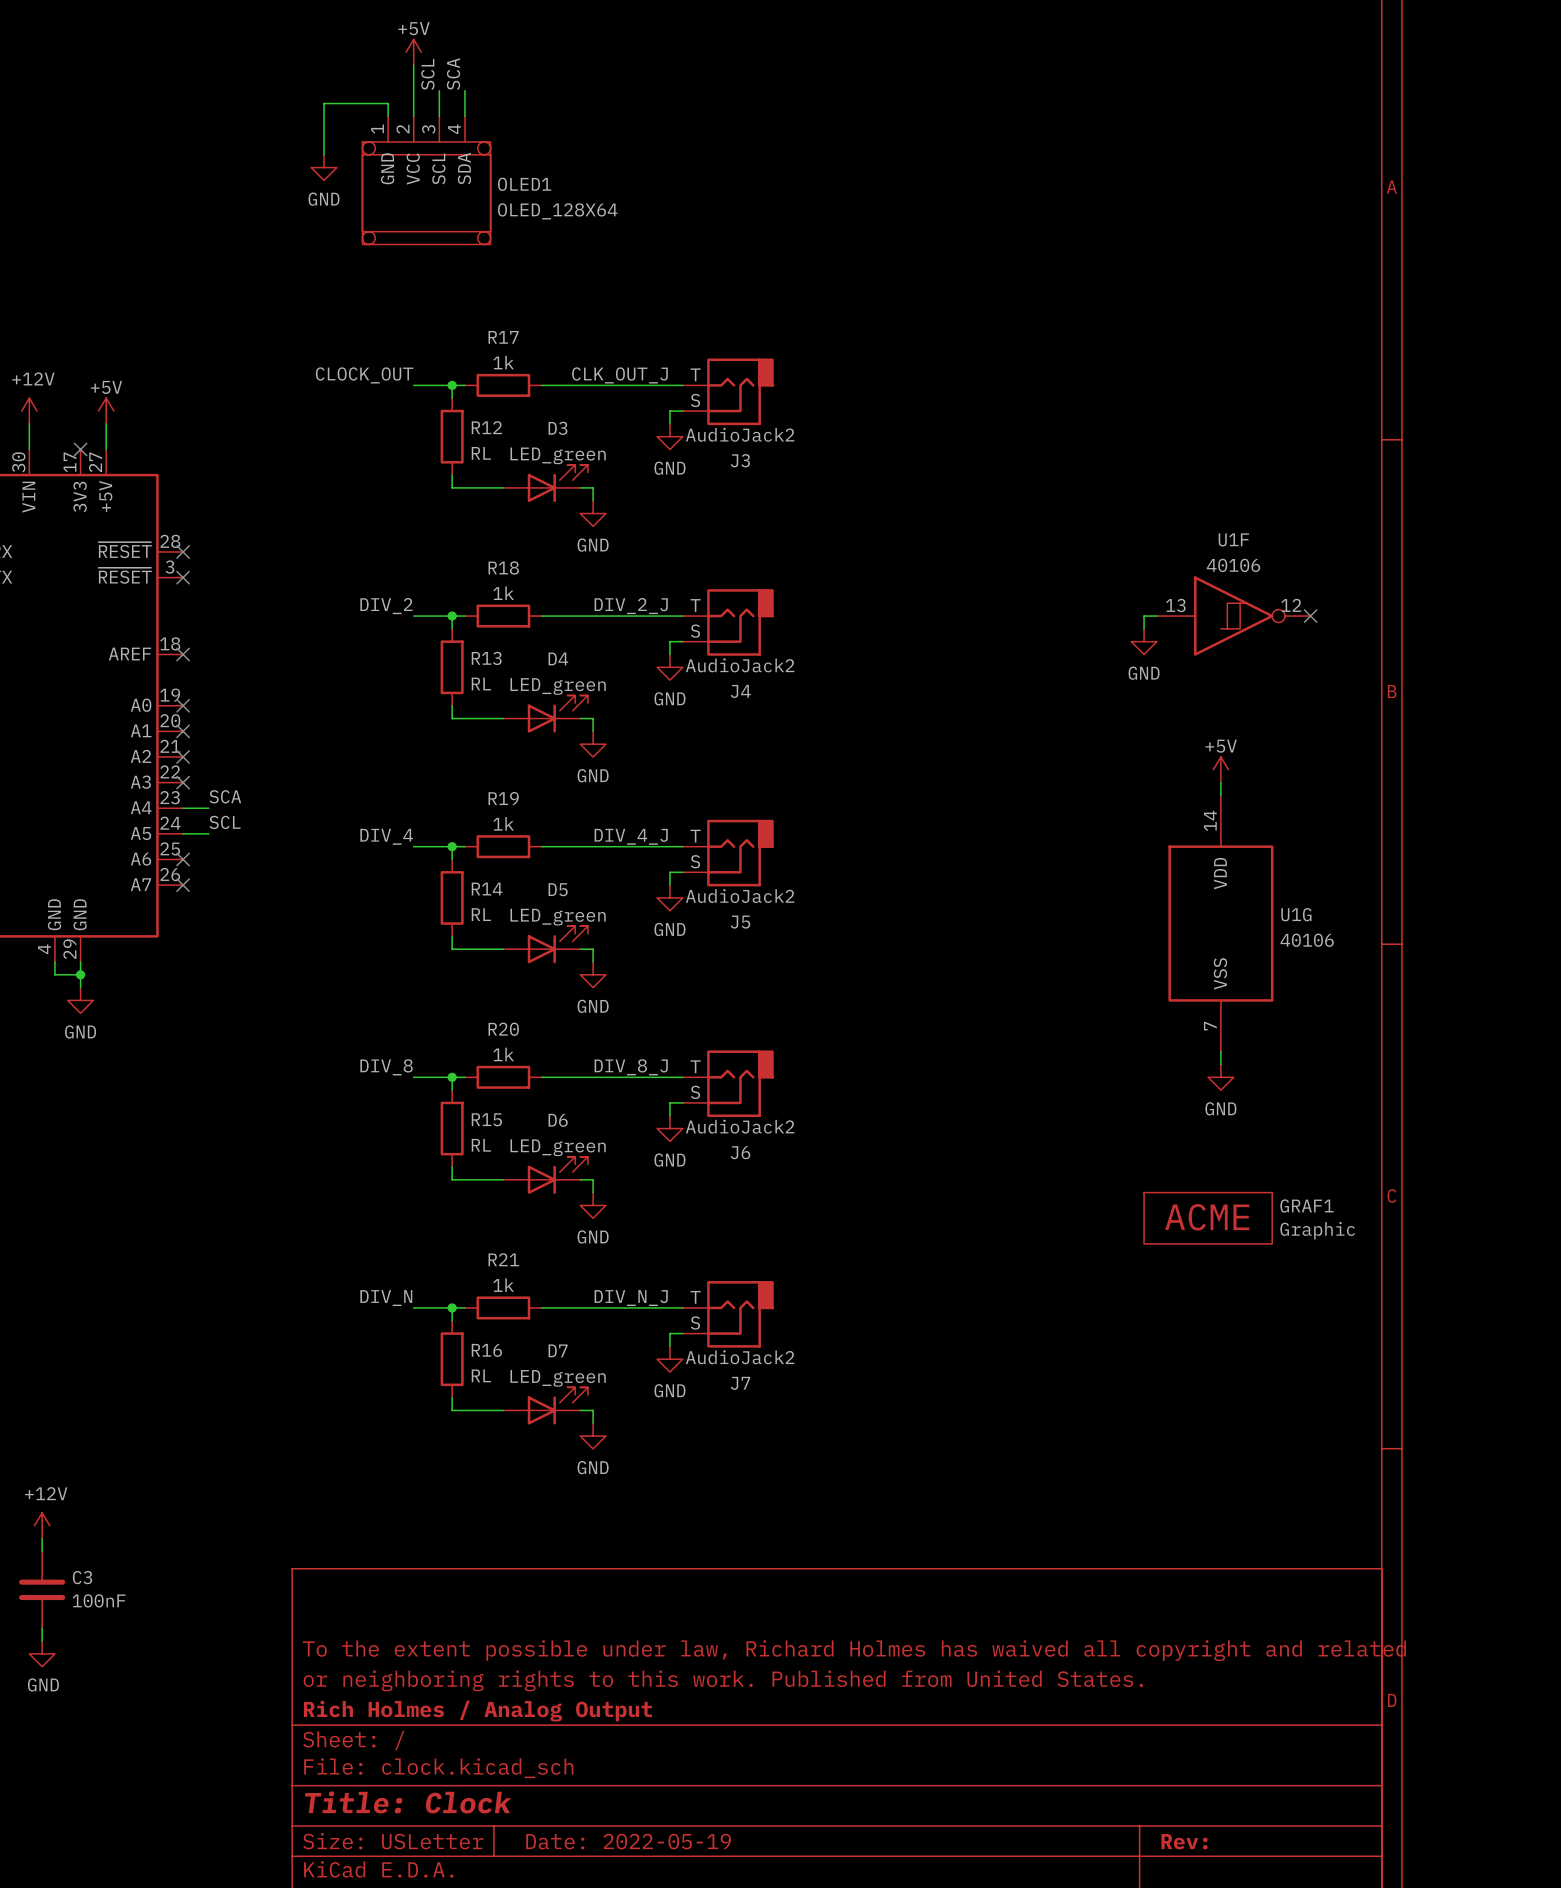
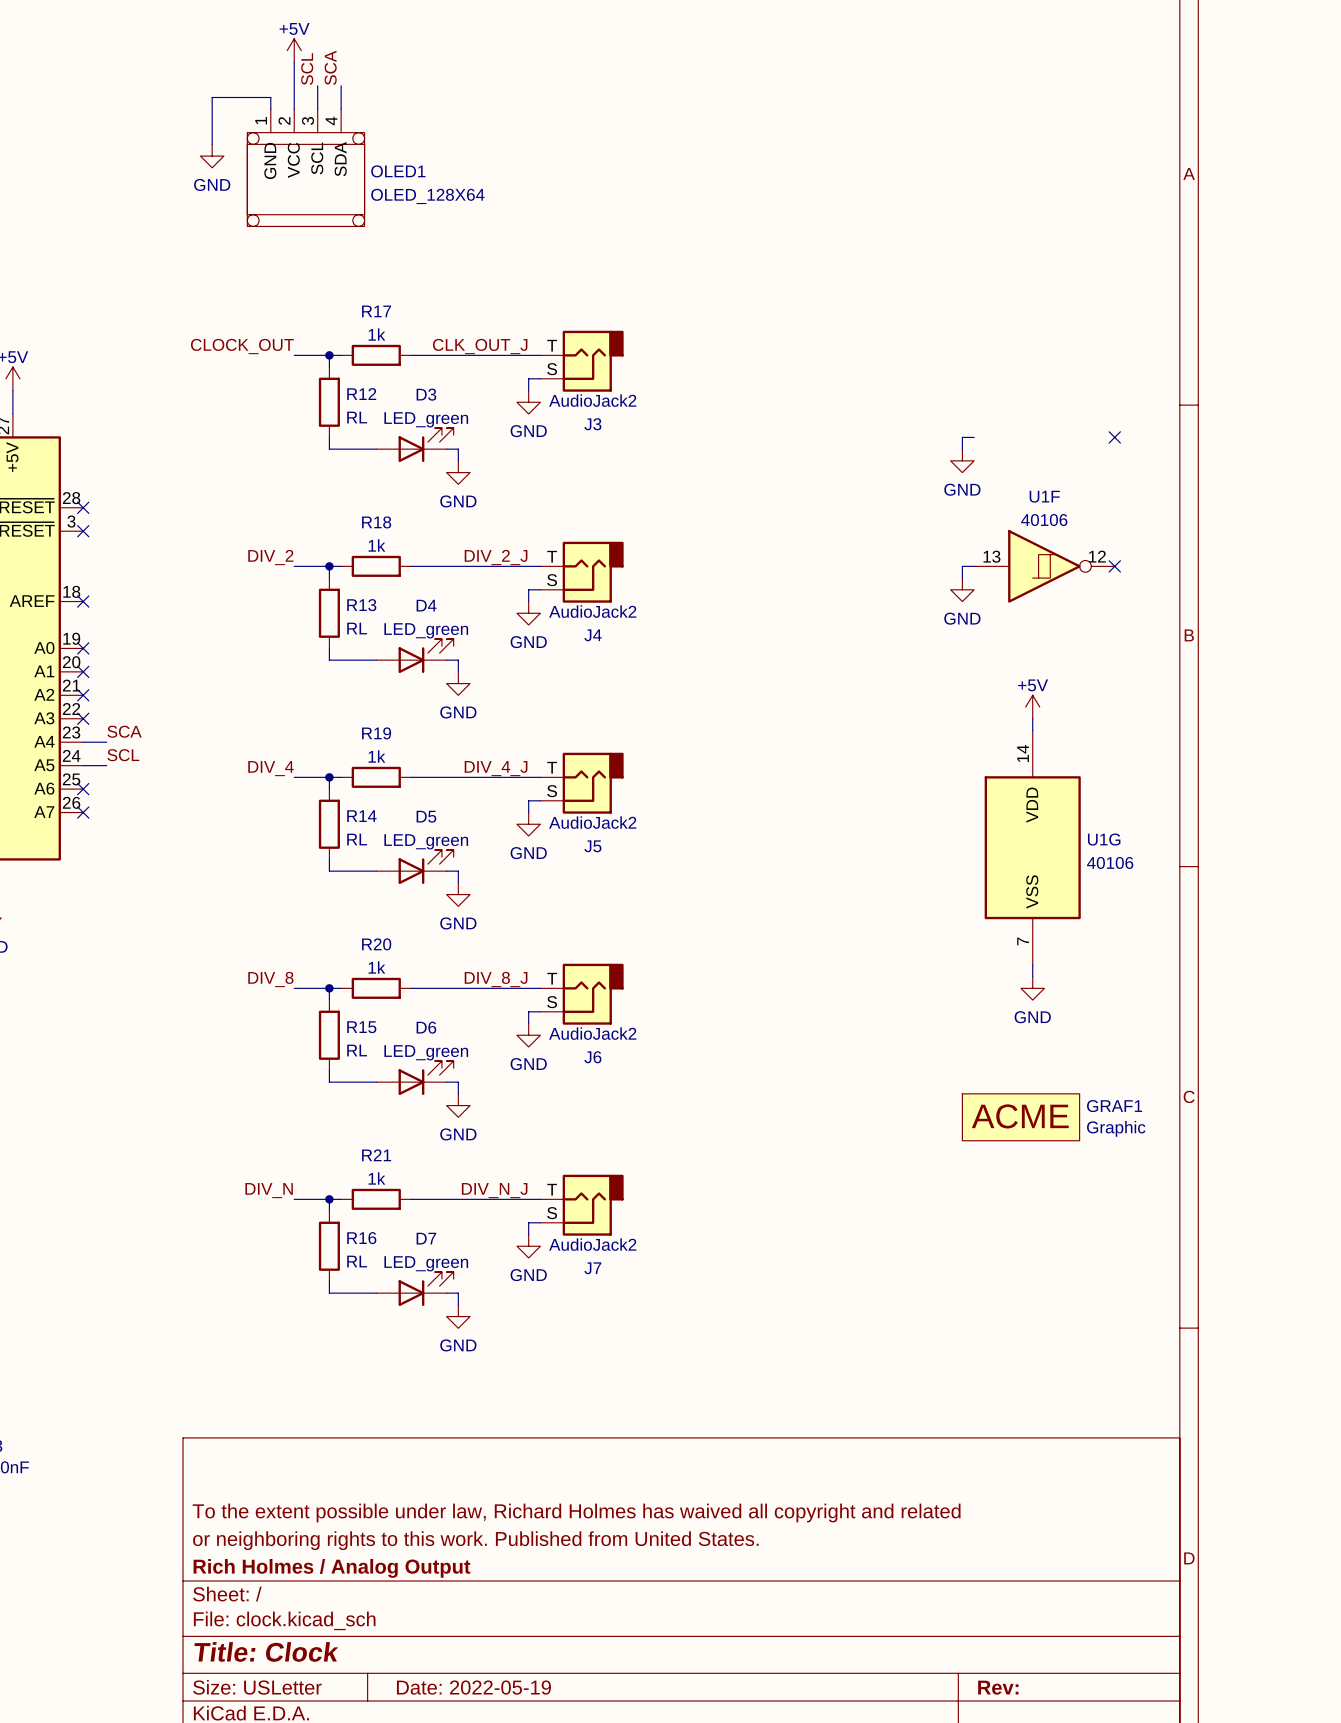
wire: none -> (974, 437) (962, 437) (962, 449)
no-connect mark: none -> (1114, 437)
power symbol: none -> GND (962, 460)

